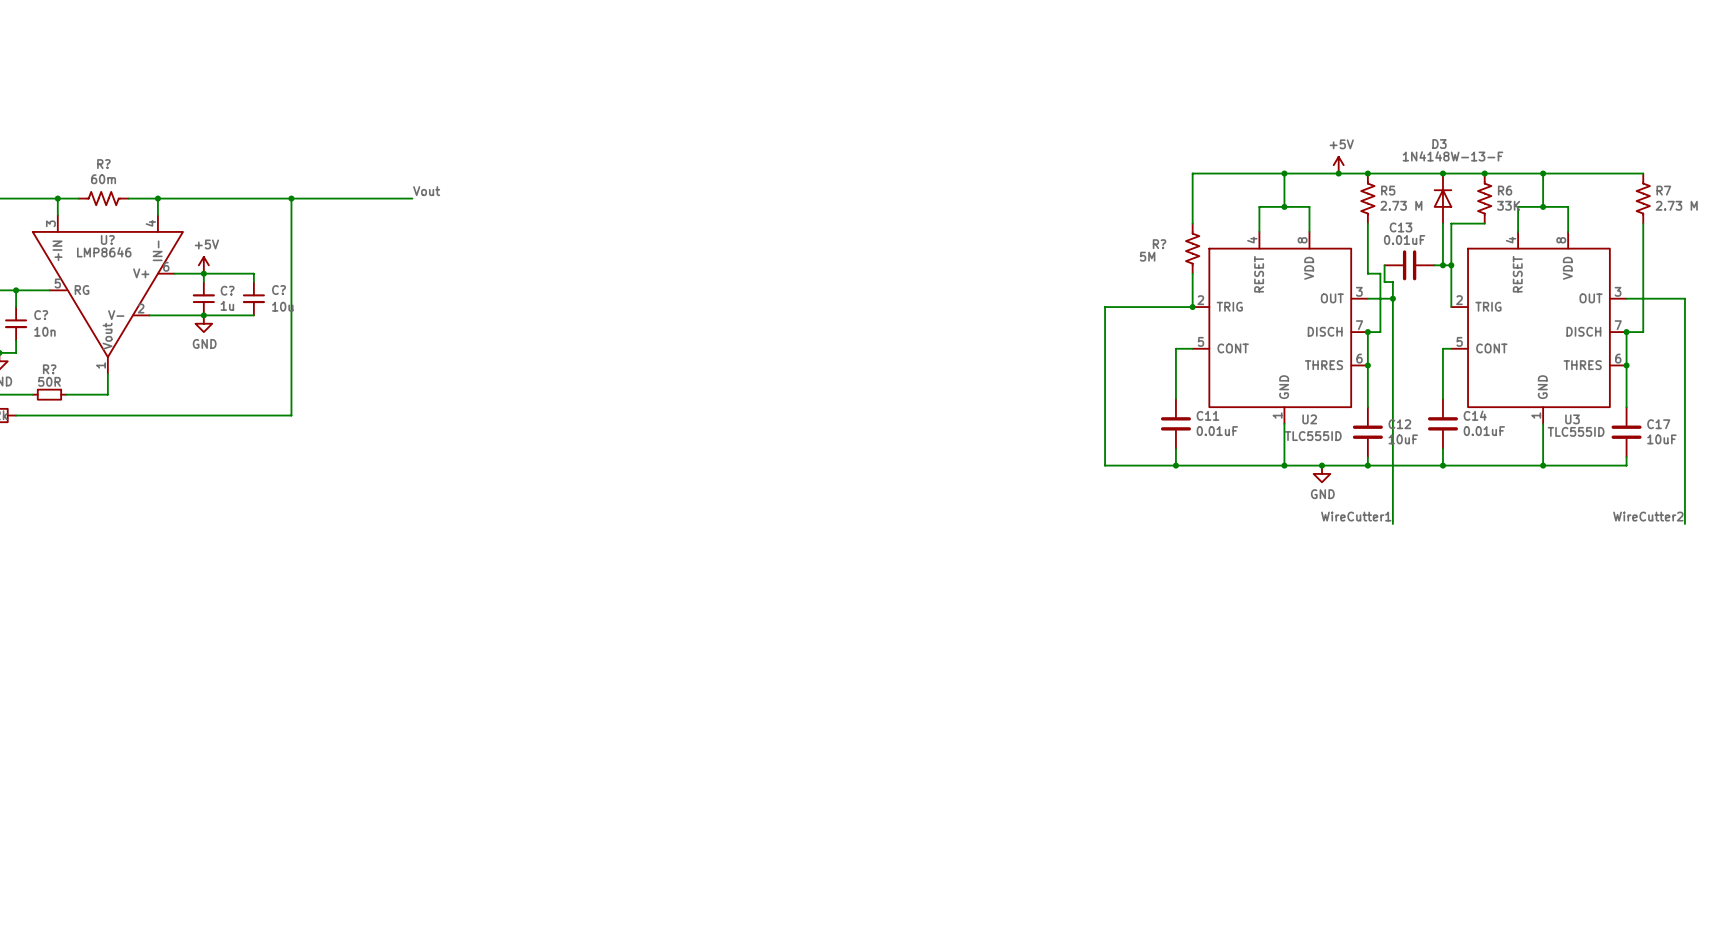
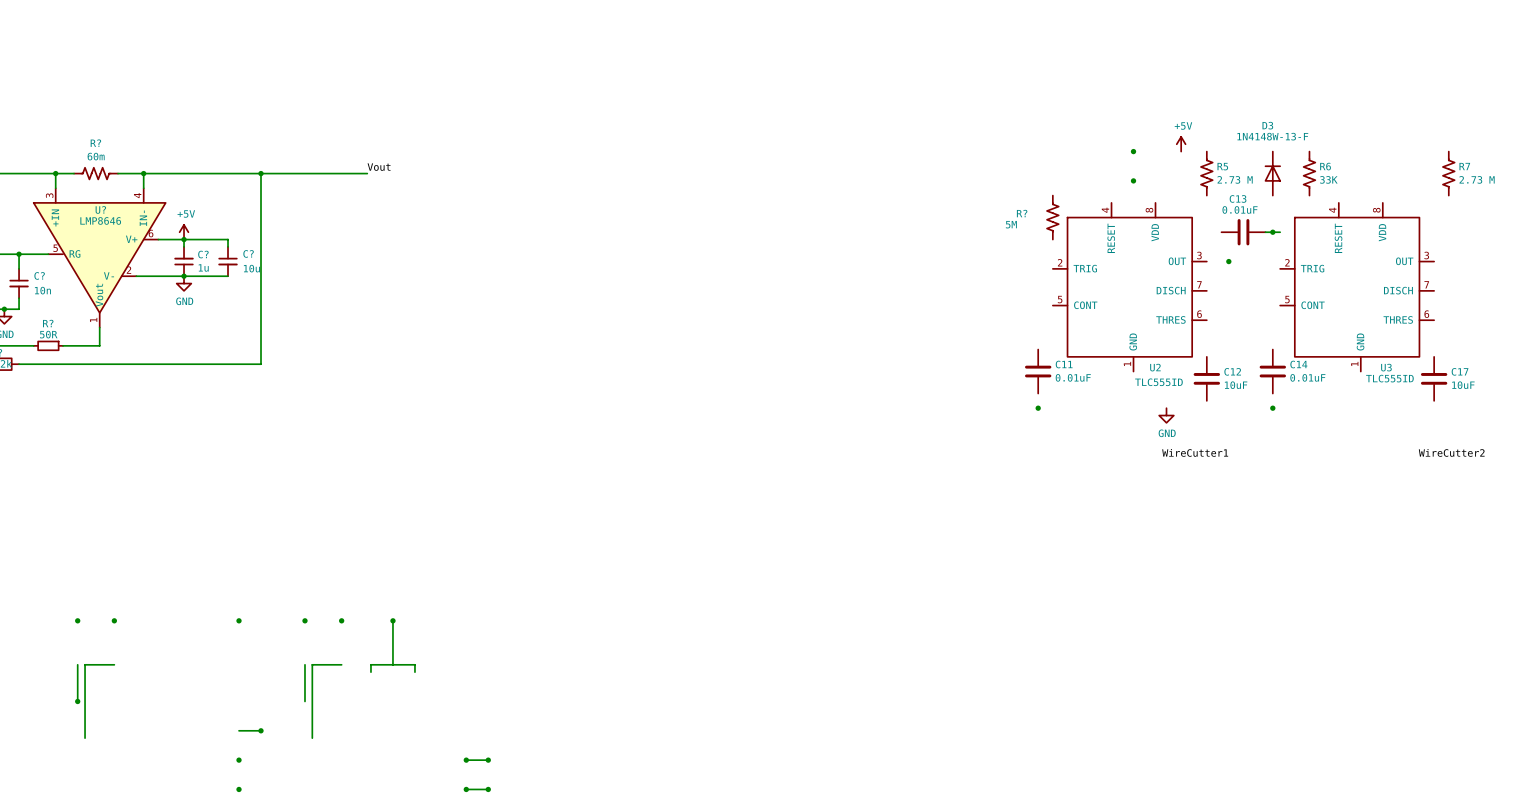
wire: (1284, 173) (1284, 206) -> none
junction: (1338, 173) -> none
junction: (1367, 173) -> none
junction: (1442, 173) -> none
junction: (1484, 173) -> none
wire: (1543, 173) (1543, 206) -> none
junction: (1543, 173) -> none
wire: (1643, 173) (1192, 173) (1192, 223) -> none
junction: (1543, 206) -> none
wire: (1367, 223) (1367, 273) (1380, 273) (1380, 332) (1367, 332) (1367, 407) -> none
wire: (1442, 223) (1442, 265) -> none
wire: (1484, 223) (1451, 223) (1451, 307) -> none
wire: (1643, 223) (1643, 332) (1626, 332) (1626, 407) -> none
wire: (1259, 231) (1259, 206) (1309, 206) (1309, 231) -> none
wire: (1518, 231) (1518, 206) (1568, 206) (1568, 231) -> none
wire: (1384, 265) (1384, 282) (1392, 282) (1392, 524) -> none
junction: (1451, 265) -> none
wire: (1192, 273) (1192, 307) (1105, 307) (1105, 465) (1626, 465) (1626, 457) -> none
wire: (1367, 298) (1392, 298) -> none
wire: (1626, 298) (1684, 298) (1684, 524) -> none
junction: (1192, 307) -> none
junction: (1367, 332) -> none
junction: (1626, 332) -> none
wire: (1192, 348) (1175, 348) (1175, 398) -> none
wire: (1451, 348) (1442, 348) (1442, 398) -> none
junction: (1367, 365) -> none
junction: (1626, 365) -> none
wire: (1284, 423) (1284, 465) -> none
wire: (1543, 423) (1543, 465) -> none
wire: (1175, 448) (1175, 465) -> none
wire: (1442, 448) (1442, 465) -> none
wire: (1367, 457) (1367, 465) -> none
junction: (1284, 465) -> none
junction: (1321, 465) -> none
junction: (1367, 465) -> none
junction: (1543, 465) -> none
junction: none -> (77, 620)
junction: none -> (114, 620)
junction: none -> (239, 620)
junction: none -> (304, 620)
junction: none -> (341, 620)
wire: none -> (392, 620) (392, 664)
junction: none -> (392, 620)
wire: none -> (77, 664) (77, 701)
wire: none -> (114, 664) (85, 664) (85, 738)
wire: none -> (304, 664) (304, 701)
wire: none -> (341, 664) (312, 664) (312, 738)
wire: none -> (370, 672) (370, 664) (414, 664) (414, 672)
junction: none -> (77, 701)
wire: none -> (239, 730) (261, 730)
junction: none -> (261, 730)
junction: none -> (239, 760)
wire: none -> (466, 760) (488, 760)
junction: none -> (466, 760)
junction: none -> (488, 760)
junction: none -> (239, 789)
wire: none -> (466, 789) (488, 789)
junction: none -> (466, 789)
junction: none -> (488, 789)

